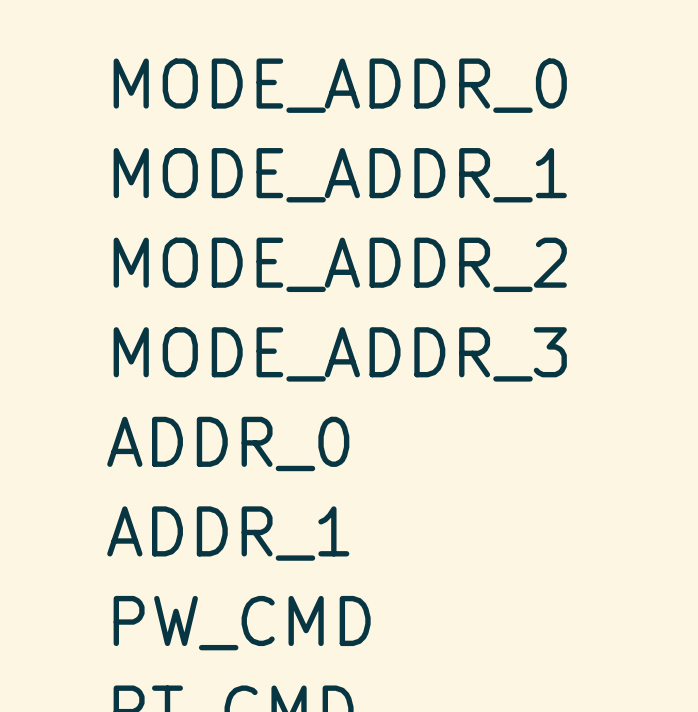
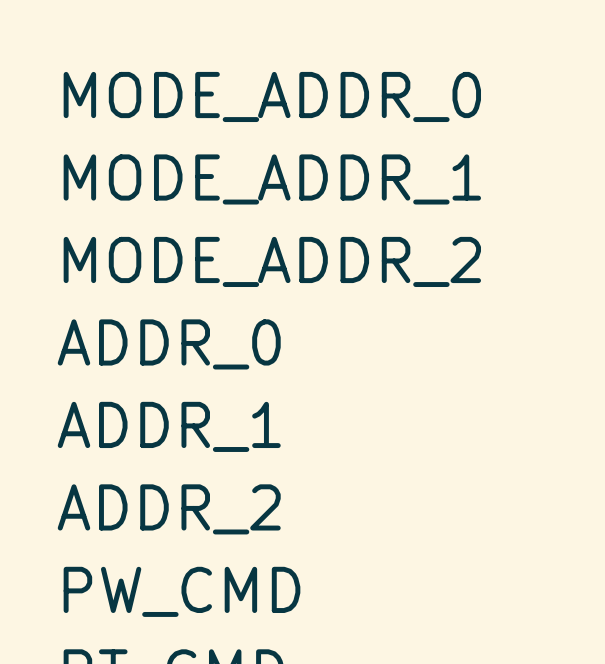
label: MODE_ADDR_3 (340, 354) -> ADDR_0 (169, 344)
label: ADDR_0 (228, 443) -> ADDR_1 (169, 426)
label: ADDR_1 (228, 533) -> ADDR_2 (169, 509)

